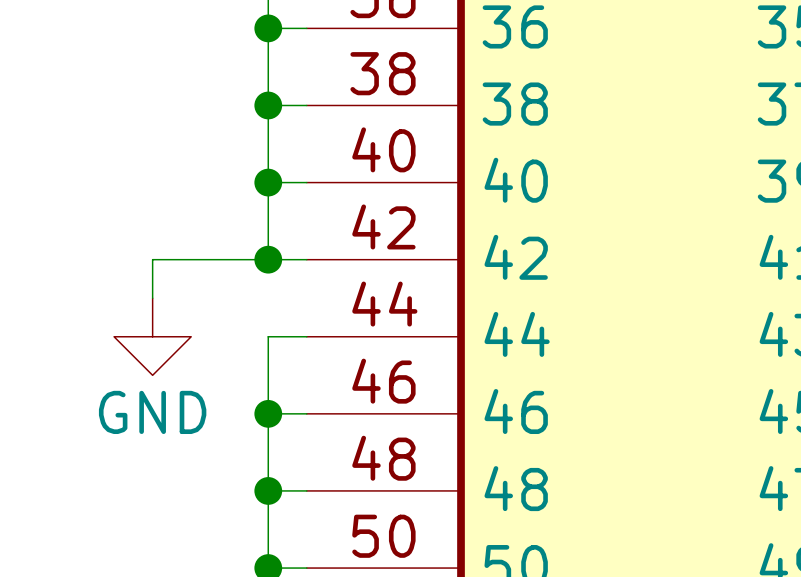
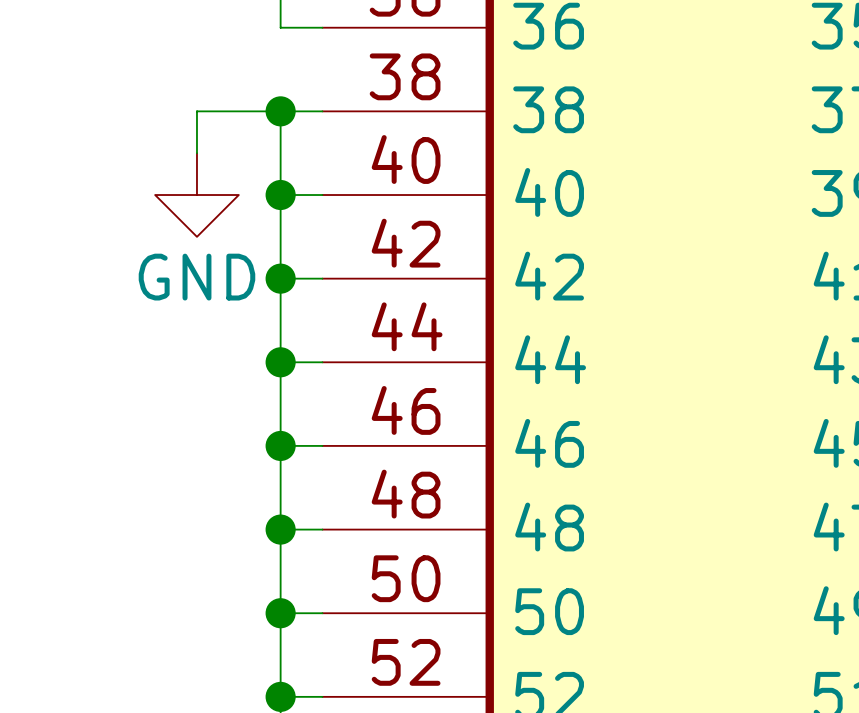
wire: (268, 28) (268, 105) -> (196, 153) (196, 111) (280, 111)
junction: (268, 28) -> none
wire: (268, 259) (152, 259) (152, 298) -> (280, 278) (280, 362)
power symbol position: GND (152, 336) -> GND (196, 195)
junction: none -> (280, 362)

